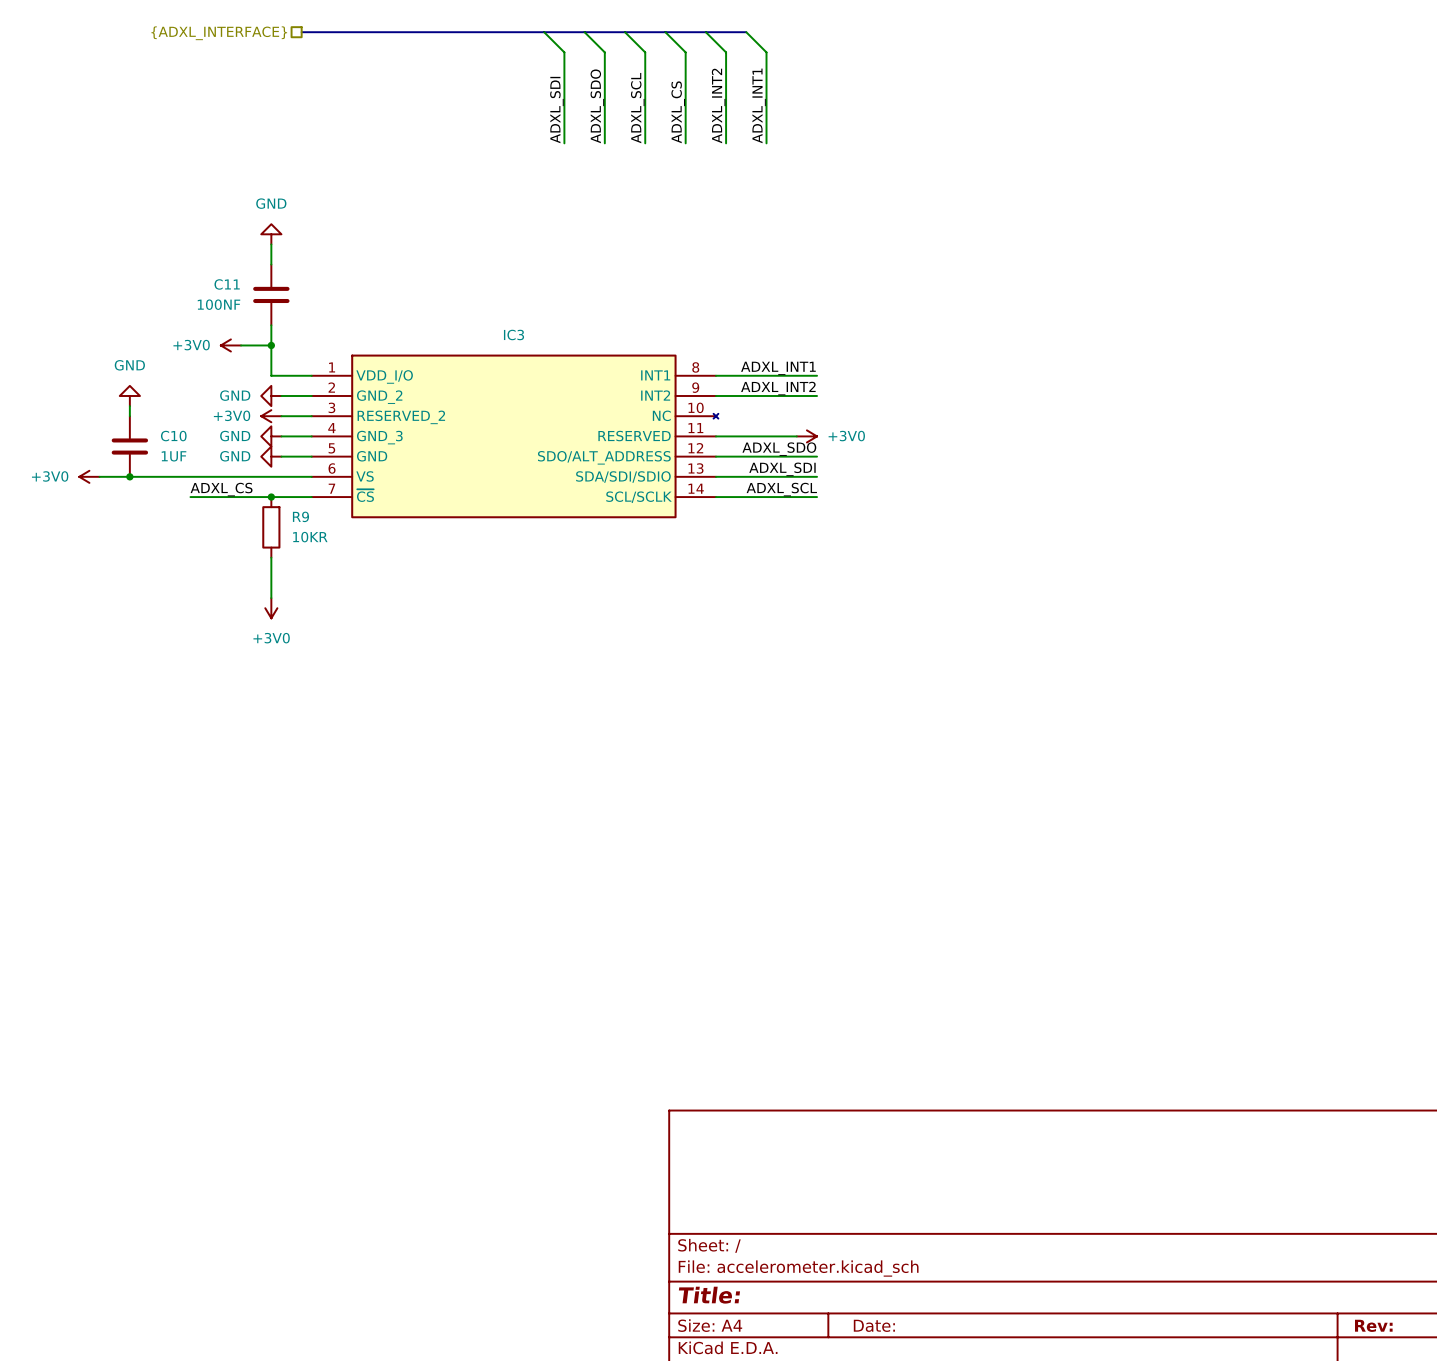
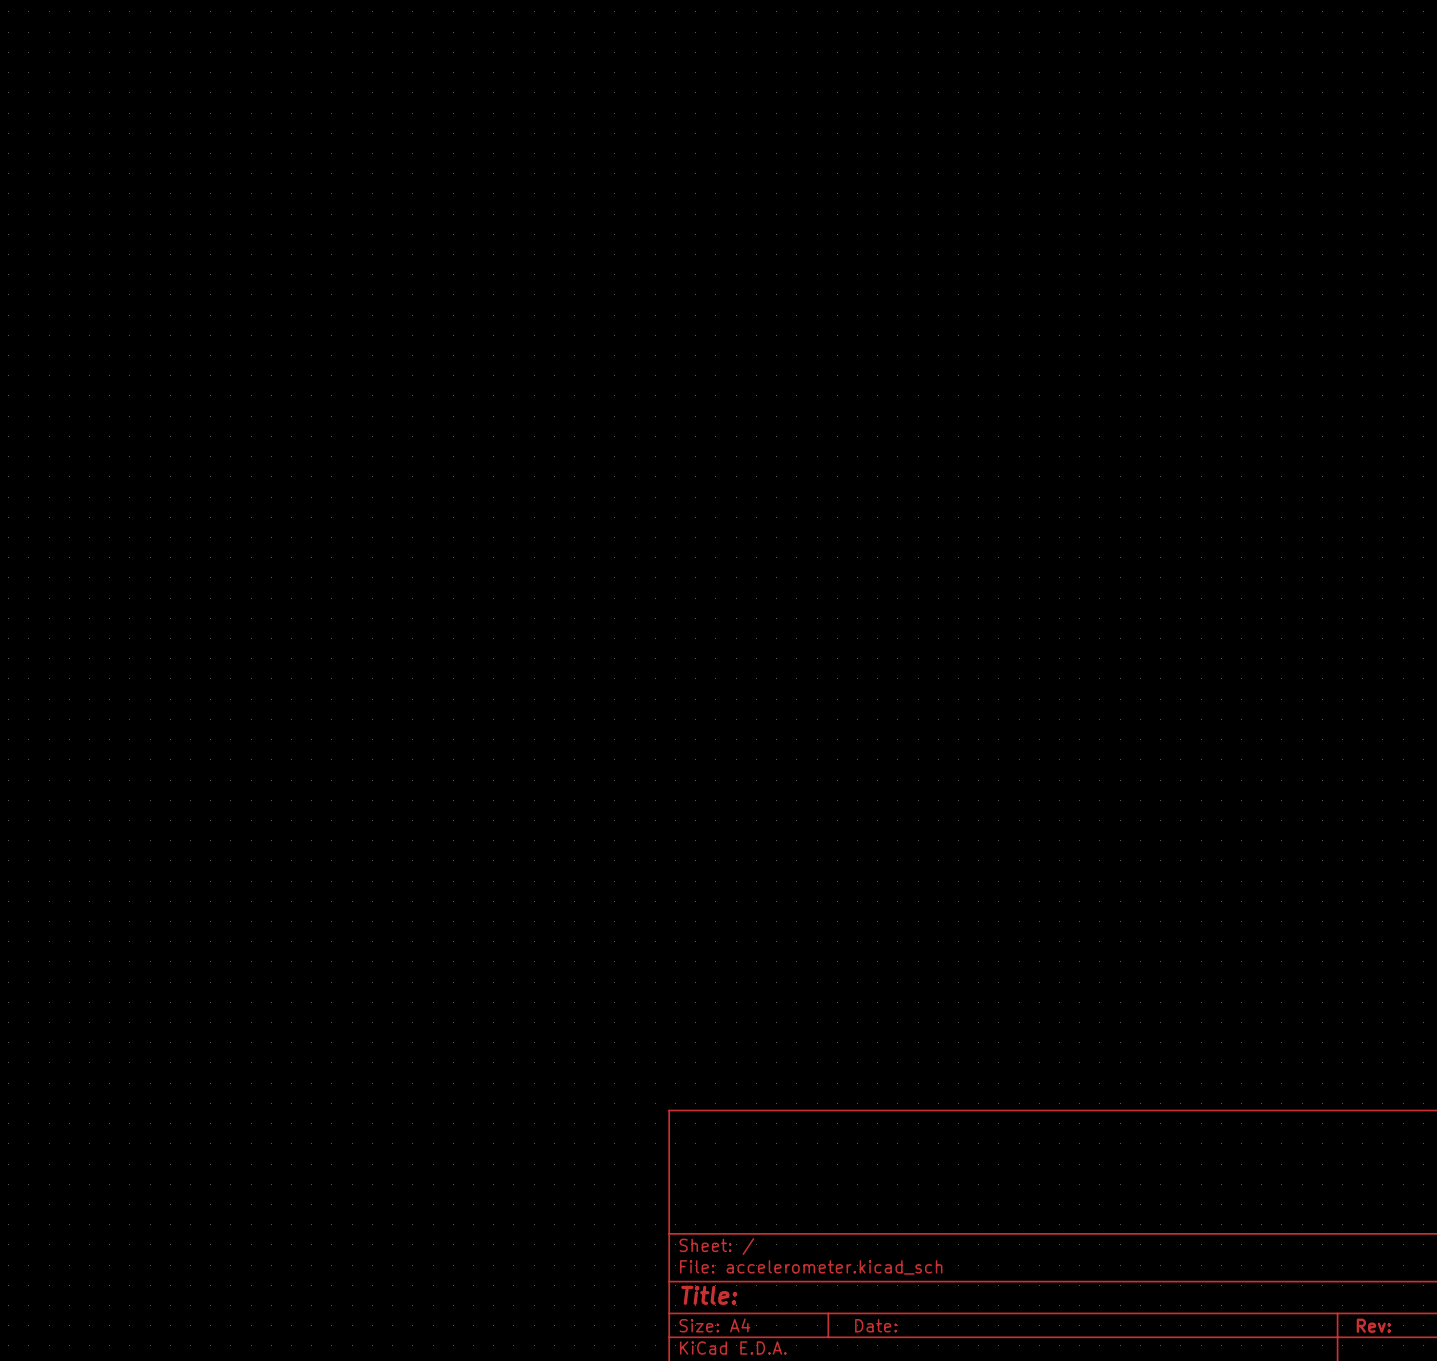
bus: (301, 32) (746, 32) -> none
wire: (544, 32) (564, 52) (564, 143) -> none
wire: (584, 32) (604, 52) (604, 143) -> none
wire: (625, 32) (645, 52) (645, 143) -> none
wire: (665, 32) (685, 52) (685, 143) -> none
wire: (705, 32) (726, 52) (726, 143) -> none
wire: (746, 32) (766, 52) (766, 143) -> none
hierarchical label: {ADXL_INTERFACE} (219, 33) -> none
label: ADXL_INT2 (718, 105) -> none
label: ADXL_INT1 (759, 105) -> none
label: ADXL_SDO (597, 106) -> none
label: ADXL_SCL (637, 108) -> none
label: ADXL_SDI (556, 110) -> none
label: ADXL_CS (678, 112) -> none
power symbol: GND (271, 234) -> none
wire: (271, 244) (271, 264) -> none
C11: 100NF (271, 294) -> none
wire: (271, 325) (271, 375) (311, 375) -> none
power symbol: +3V0 (230, 345) -> none
wire: (241, 345) (271, 345) -> none
junction: (271, 345) -> none
label: ADXL_INT1 (778, 368) -> none
wire: (715, 375) (817, 375) -> none
label: ADXL_INT2 (778, 388) -> none
power symbol: GND (129, 395) -> none
power symbol: GND (271, 395) -> none
wire: (281, 395) (311, 395) -> none
wire: (715, 395) (817, 395) -> none
wire: (129, 406) (129, 416) -> none
power symbol: +3V0 (271, 416) -> none
wire: (281, 416) (311, 416) -> none
power symbol: GND (271, 436) -> none
wire: (281, 436) (311, 436) -> none
IC3: (515, 436) -> none
wire: (715, 436) (796, 436) -> none
power symbol: +3V0 (806, 436) -> none
C10: 1UF (129, 446) -> none
label: ADXL_SDO (779, 449) -> none
power symbol: GND (271, 456) -> none
wire: (281, 456) (311, 456) -> none
wire: (715, 456) (817, 456) -> none
label: ADXL_SDI (782, 469) -> none
power symbol: +3V0 (89, 476) -> none
wire: (99, 476) (311, 476) -> none
junction: (129, 476) -> none
wire: (715, 476) (817, 476) -> none
label: ADXL_CS (221, 489) -> none
label: ADXL_SCL (781, 489) -> none
wire: (190, 497) (311, 497) -> none
junction: (271, 497) -> none
wire: (715, 497) (817, 497) -> none
R9: 10KR (271, 527) -> none
wire: (271, 557) (271, 598) -> none
power symbol: +3V0 (271, 608) -> none

